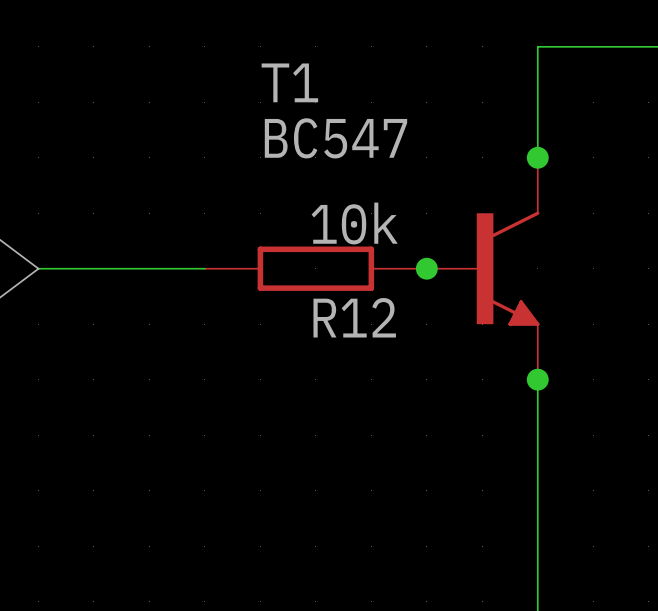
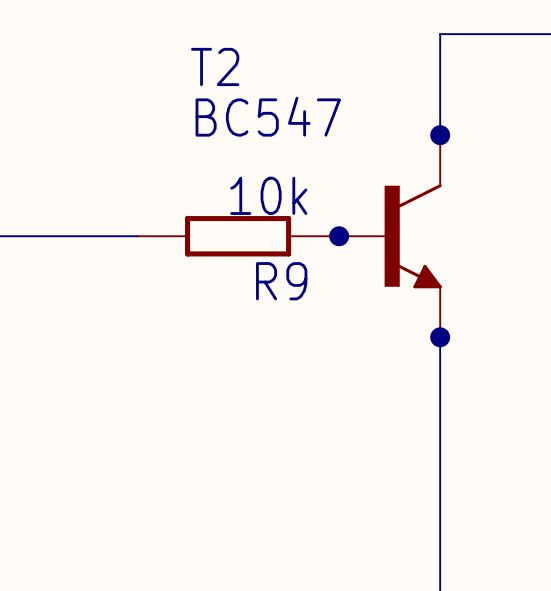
T1 name: T1 (289, 82) -> T2 (215, 66)
R12 name: R12 (354, 317) -> R9 (281, 281)

